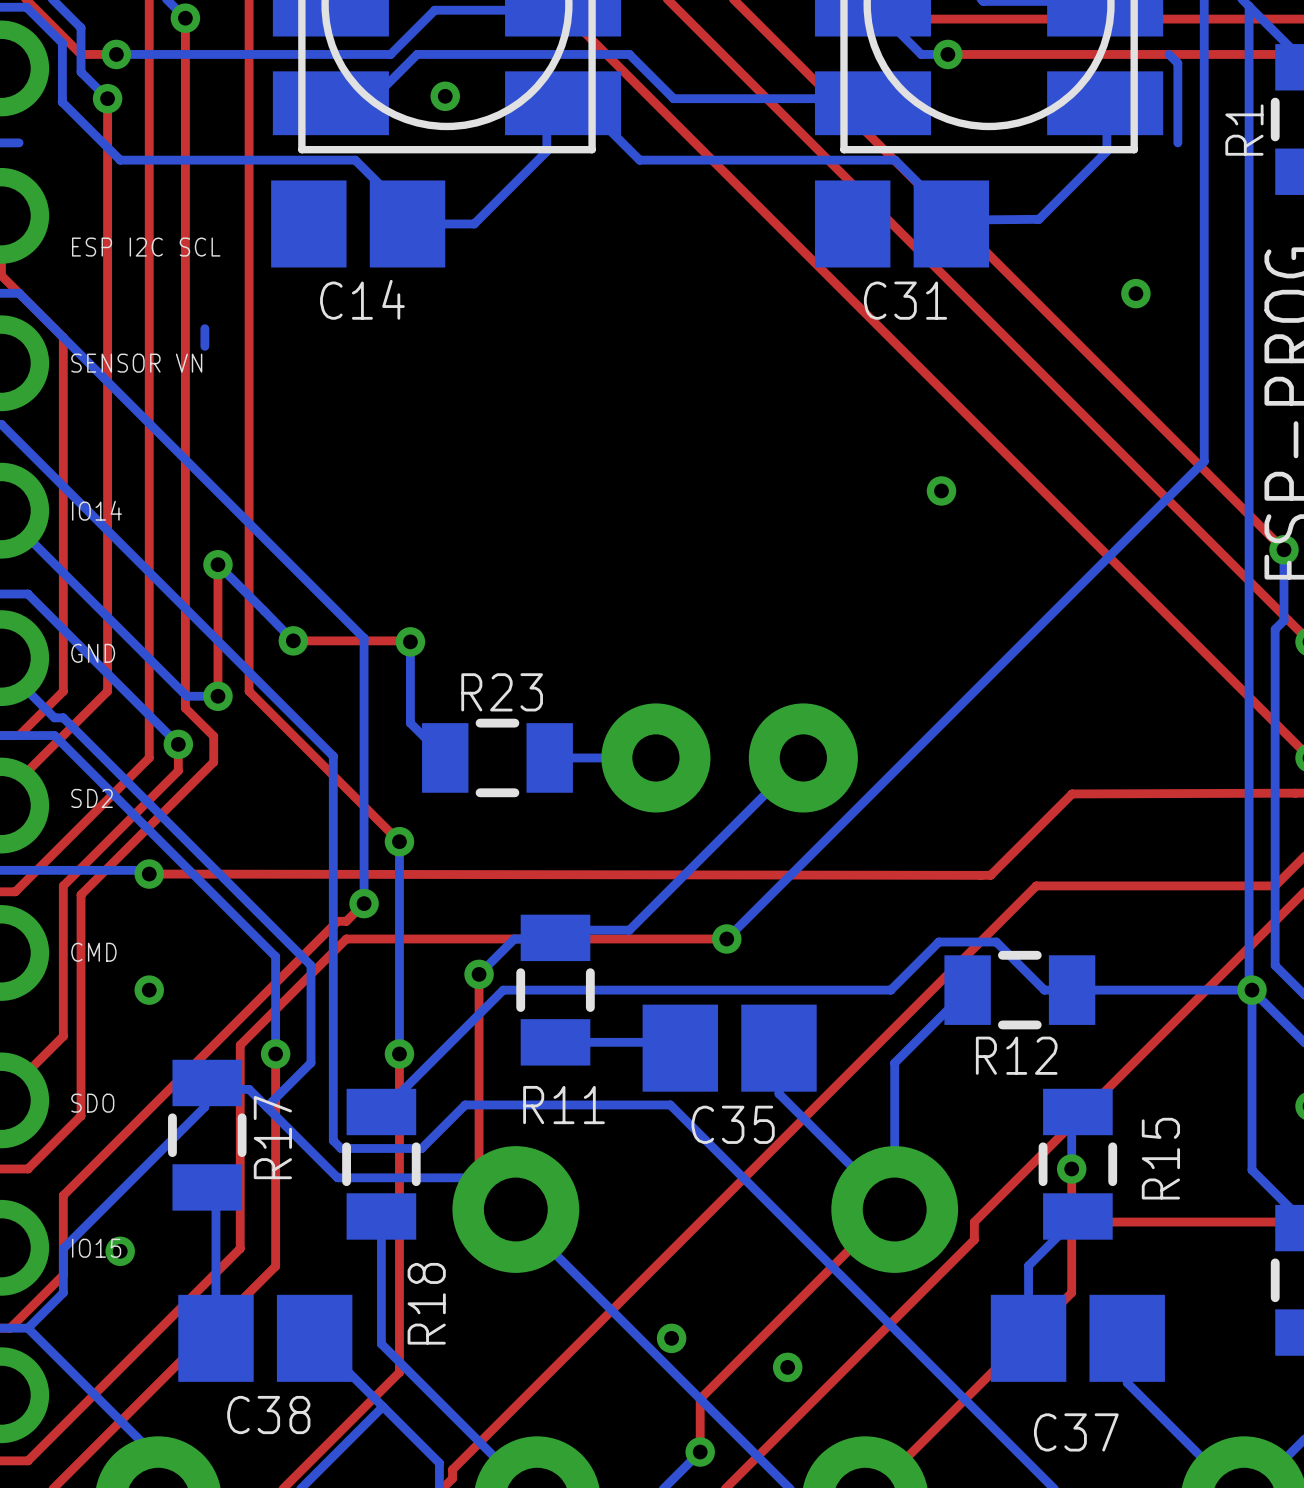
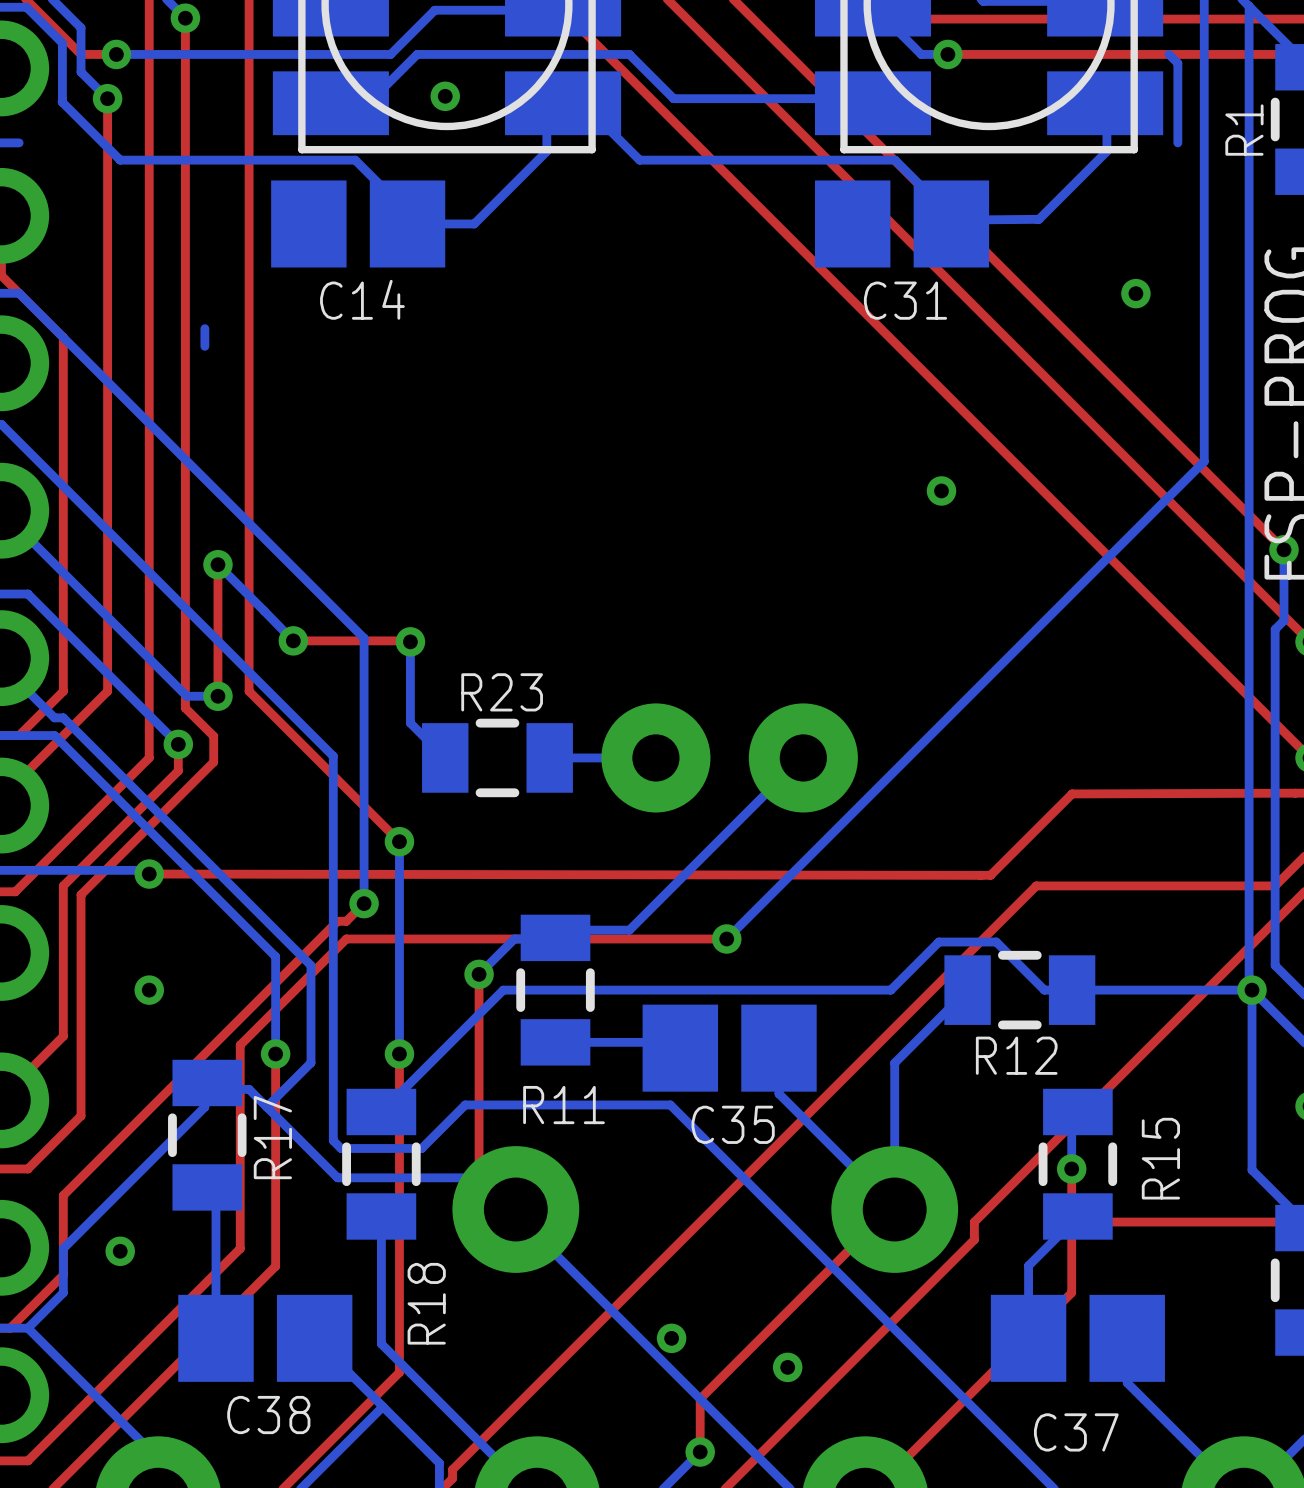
text: ESP I2C SCL (146, 247) -> none
text: SENSOR VN (136, 363) -> none
text: IO14 (96, 510) -> none
text: GND (93, 653) -> none
text: SD2 (92, 798) -> none
text: CMD (93, 952) -> none
text: SDO (92, 1103) -> none
text: IO15 (96, 1248) -> none

